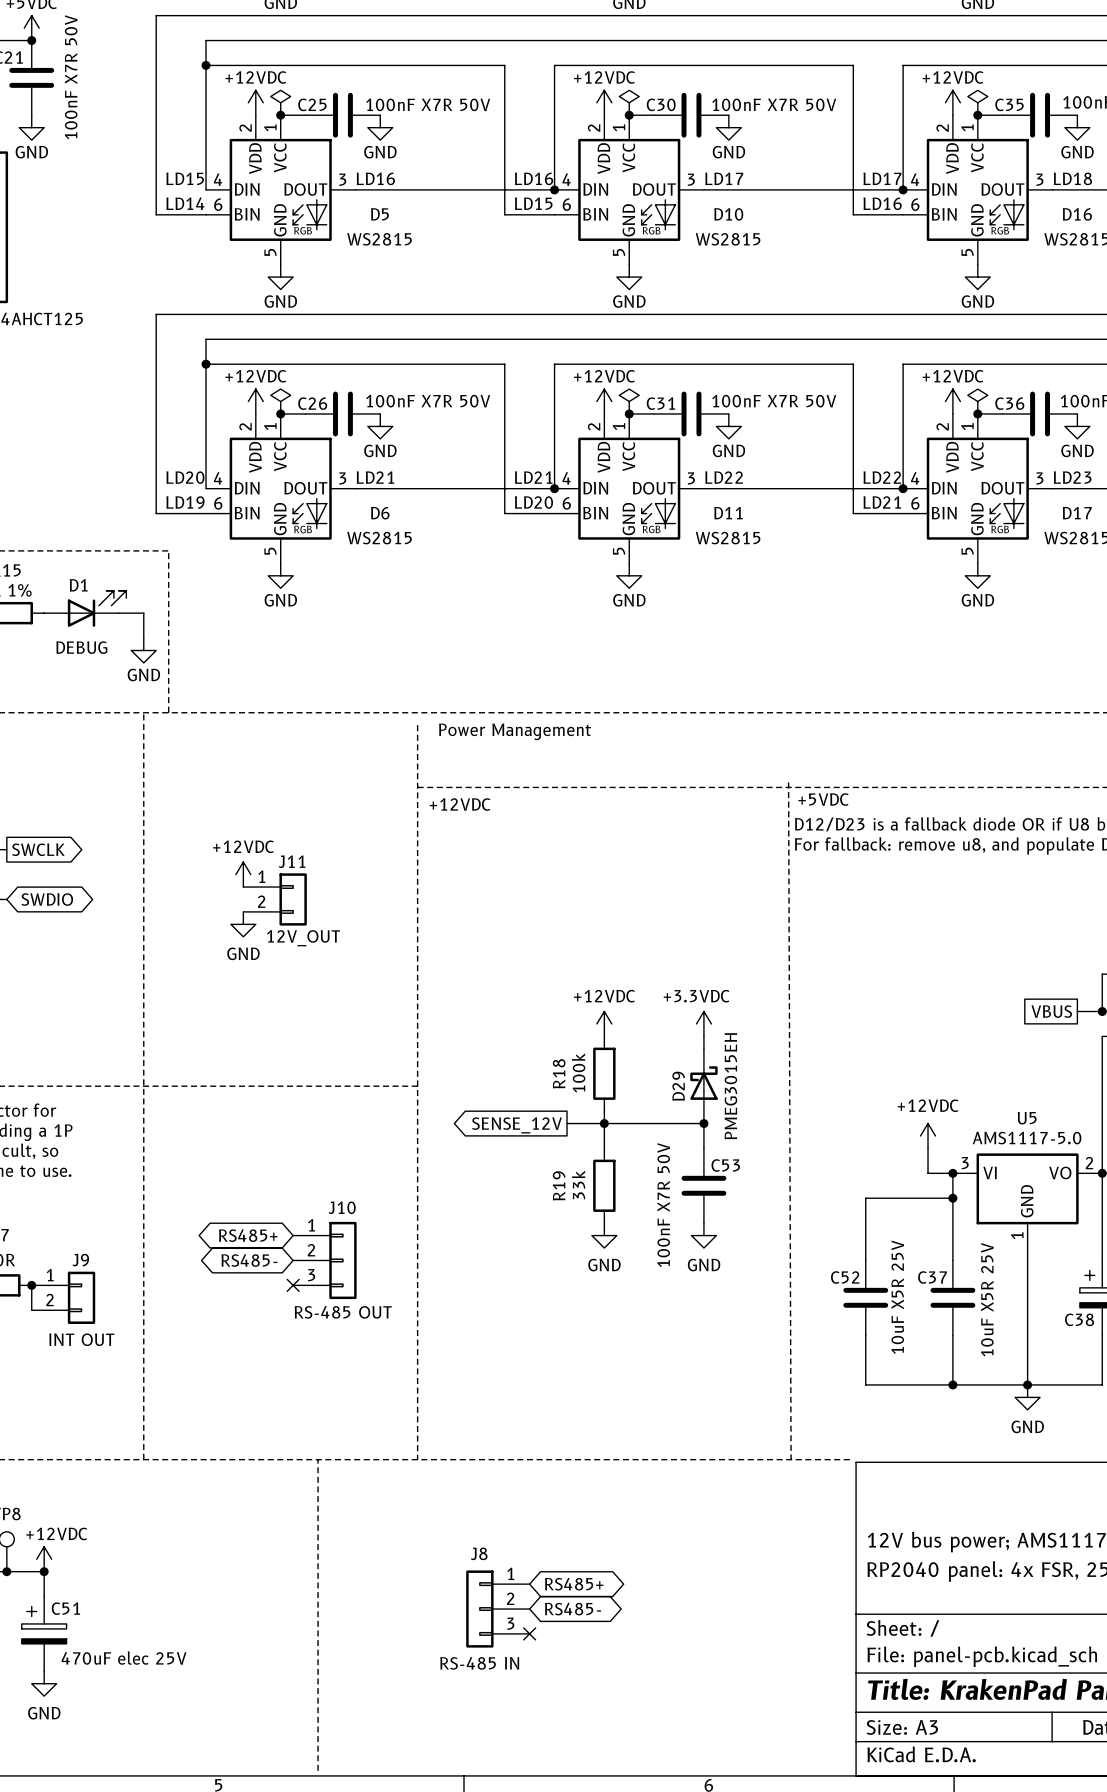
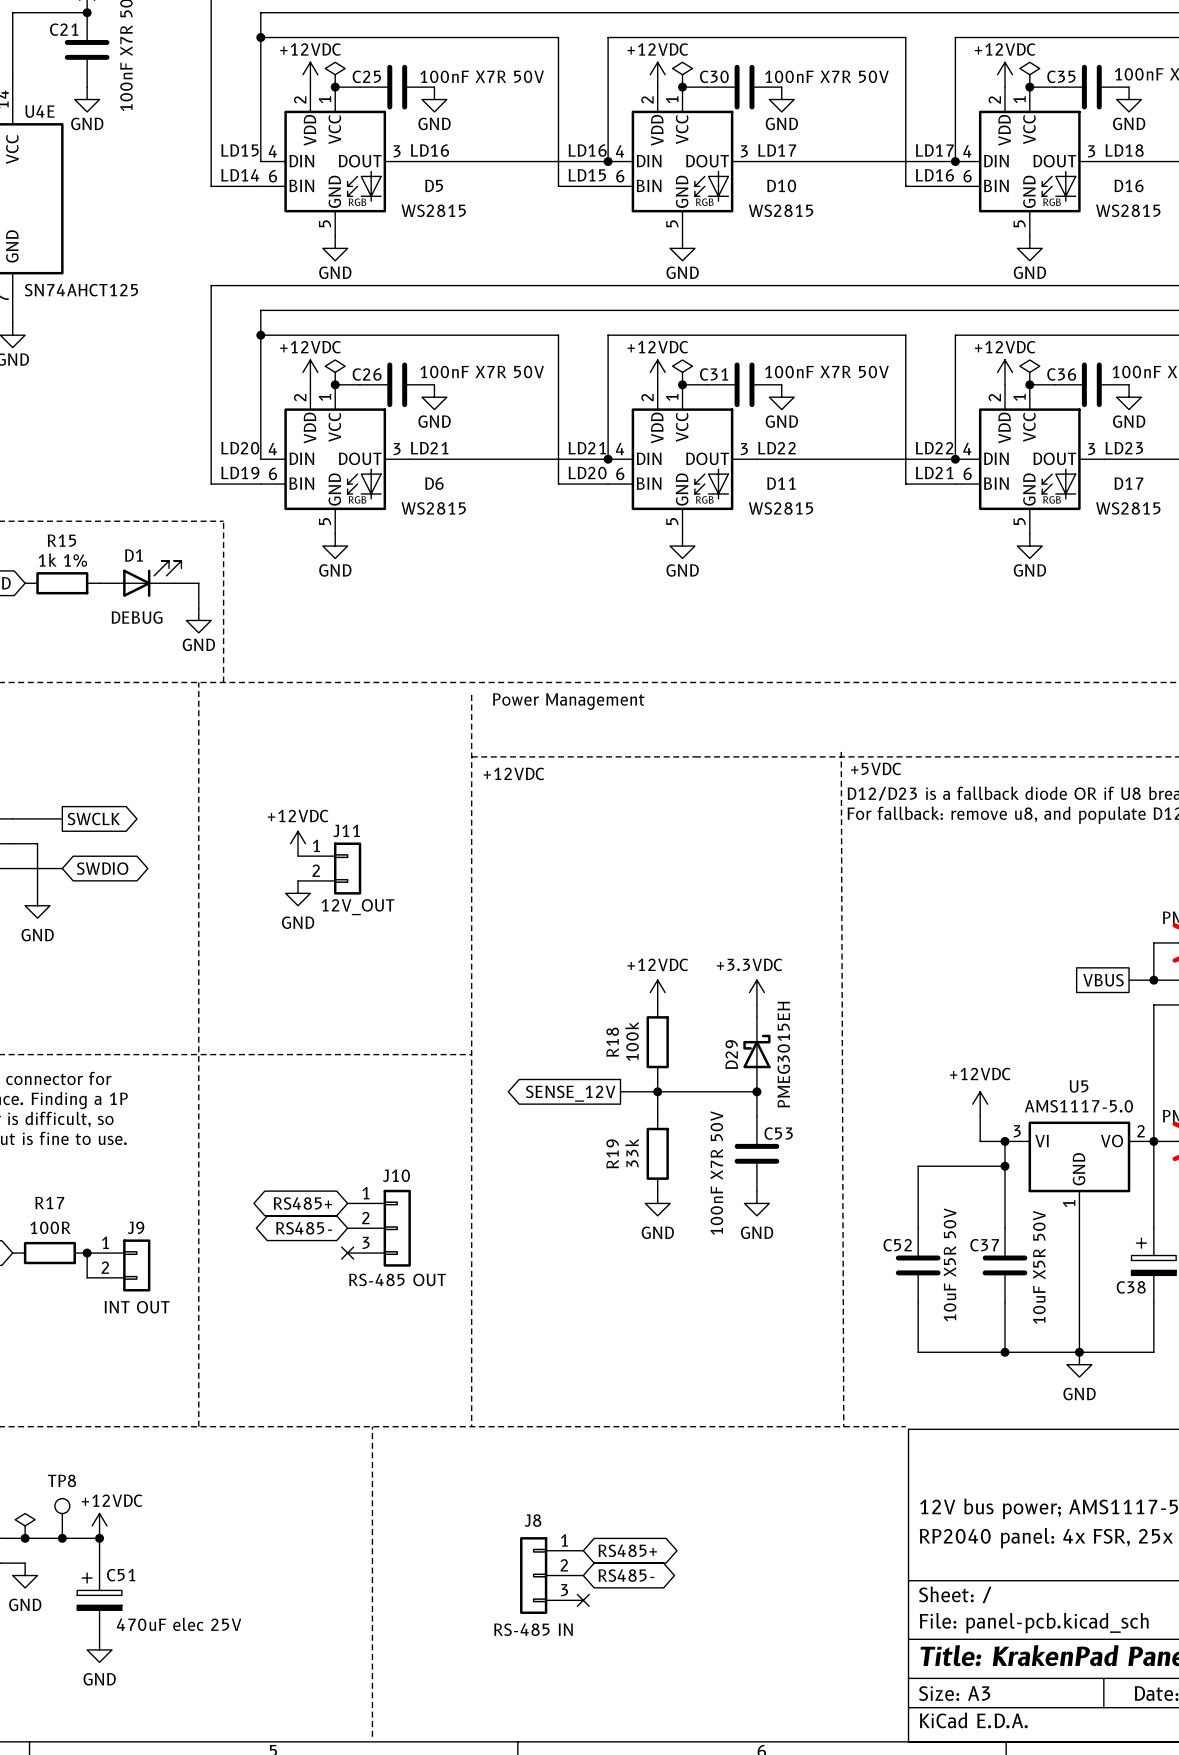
C52 value: 10uF X5R 25V (897, 1297) -> 10uF X5R 50V (950, 1264)
C37 value: 10uF X5R 25V (987, 1299) -> 10uF X5R 50V (1039, 1267)

